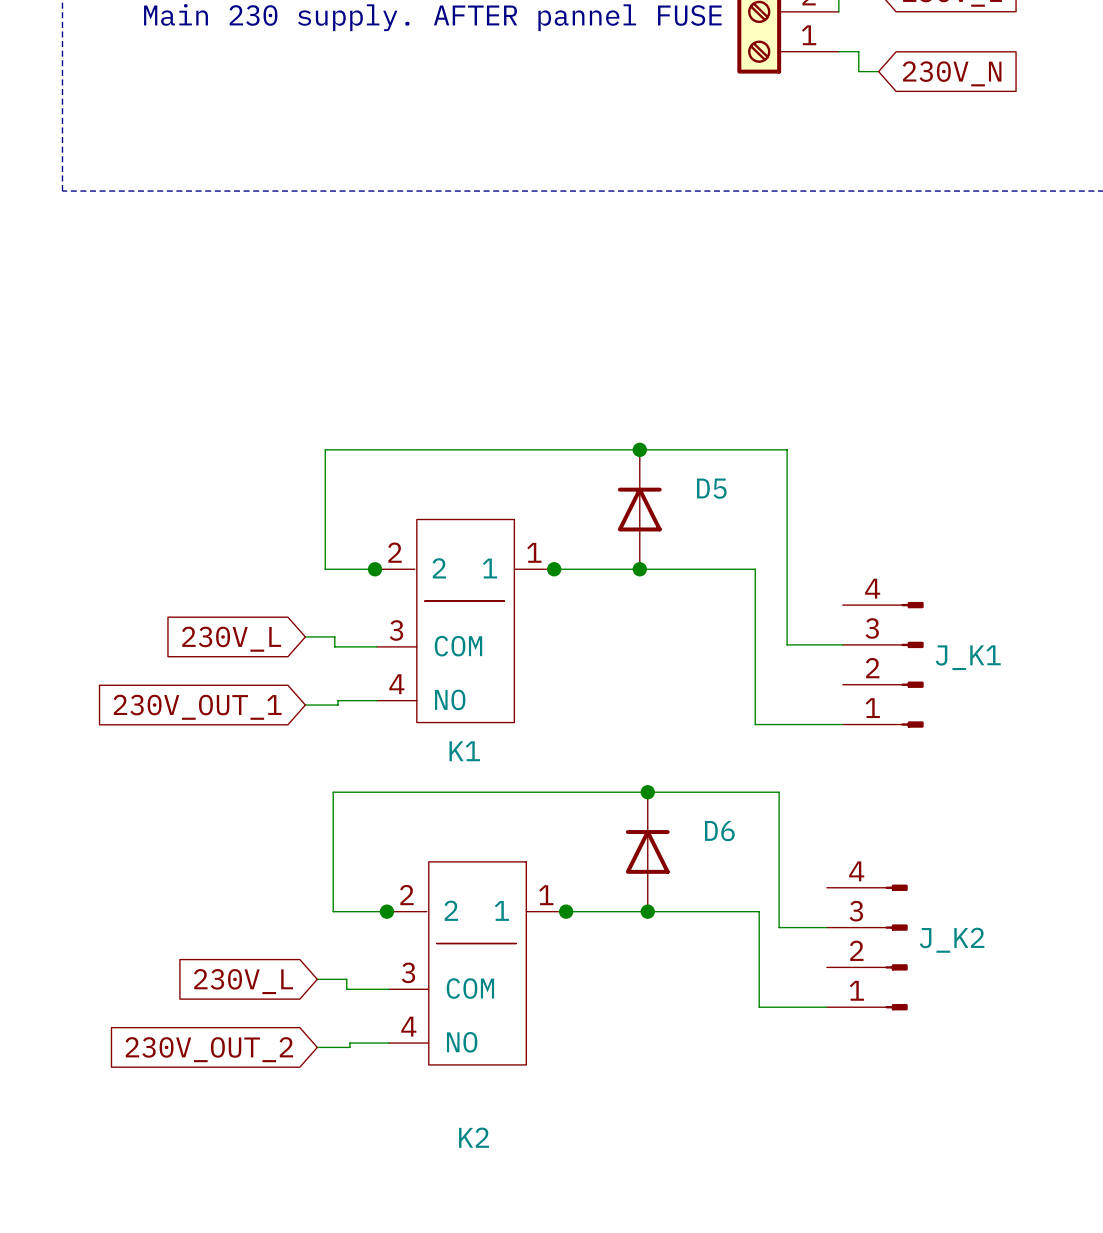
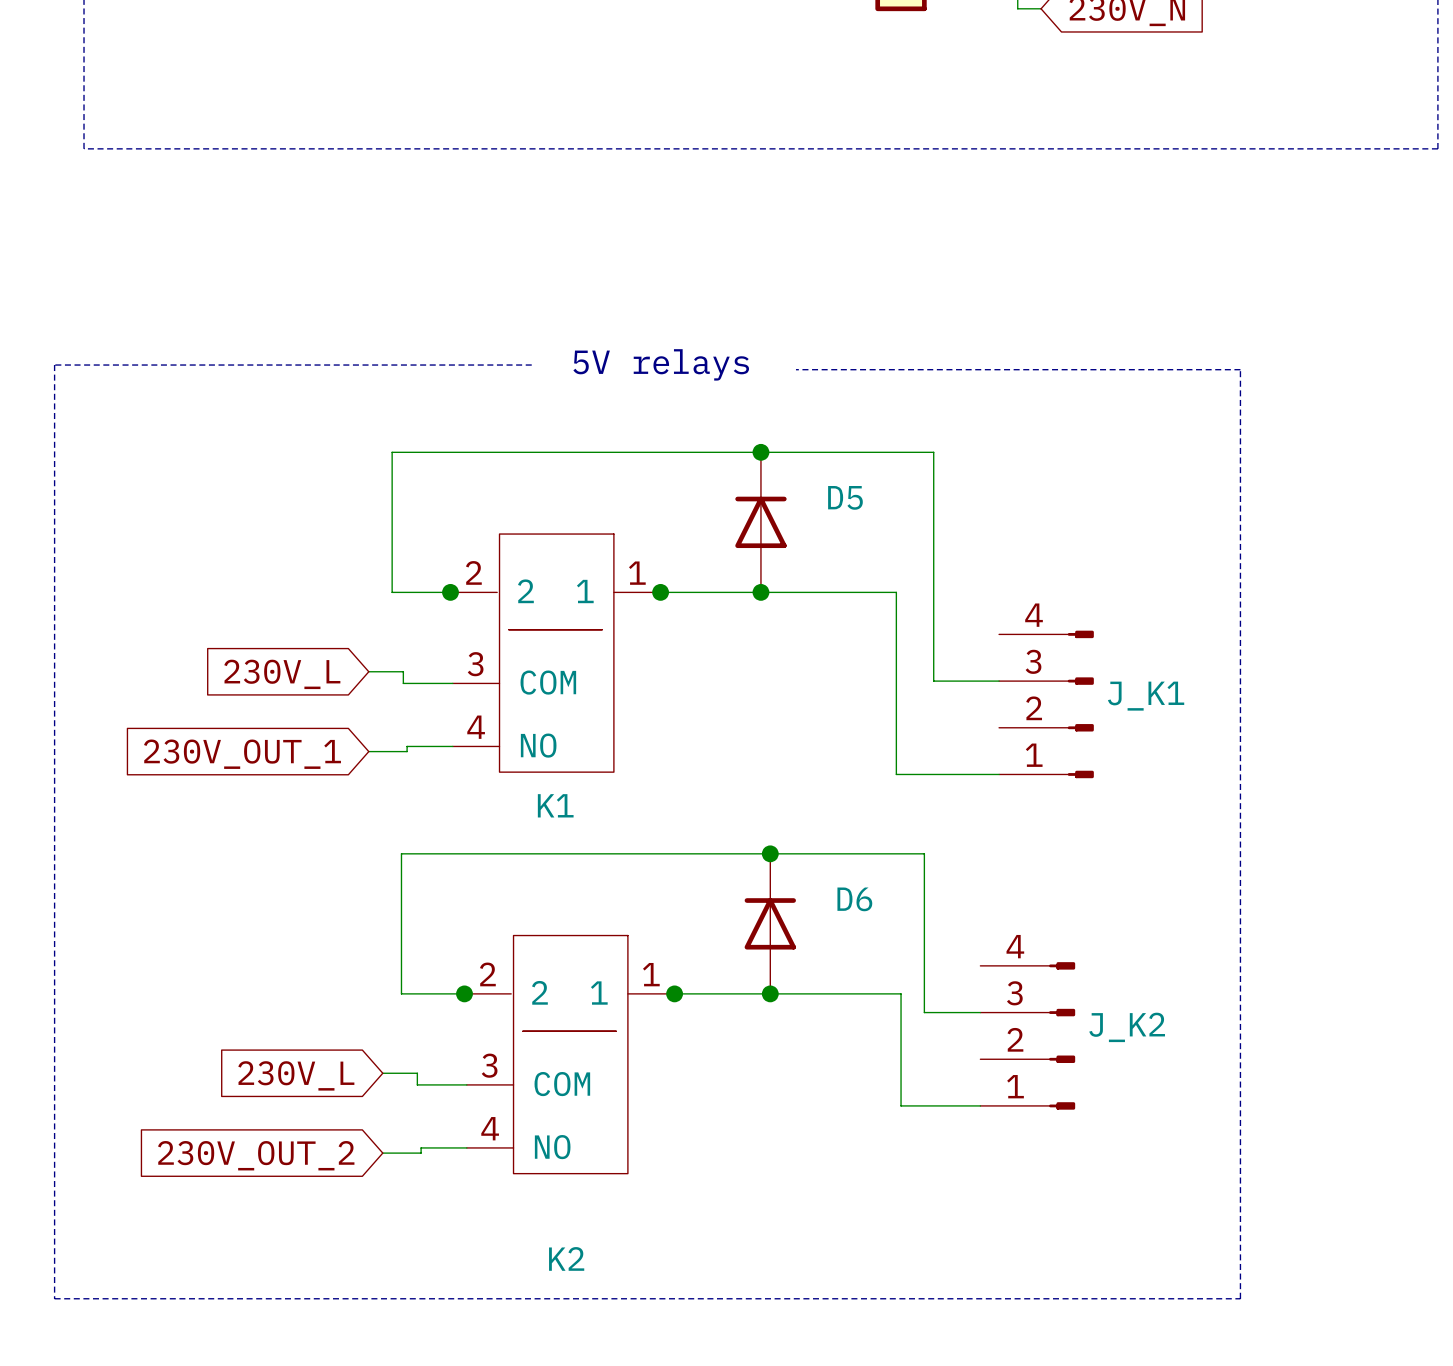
line: none -> (531, 365) (54, 365) (54, 1298) (1240, 1298) (1240, 369) (795, 369)
text: none -> 5V relays (661, 364)

